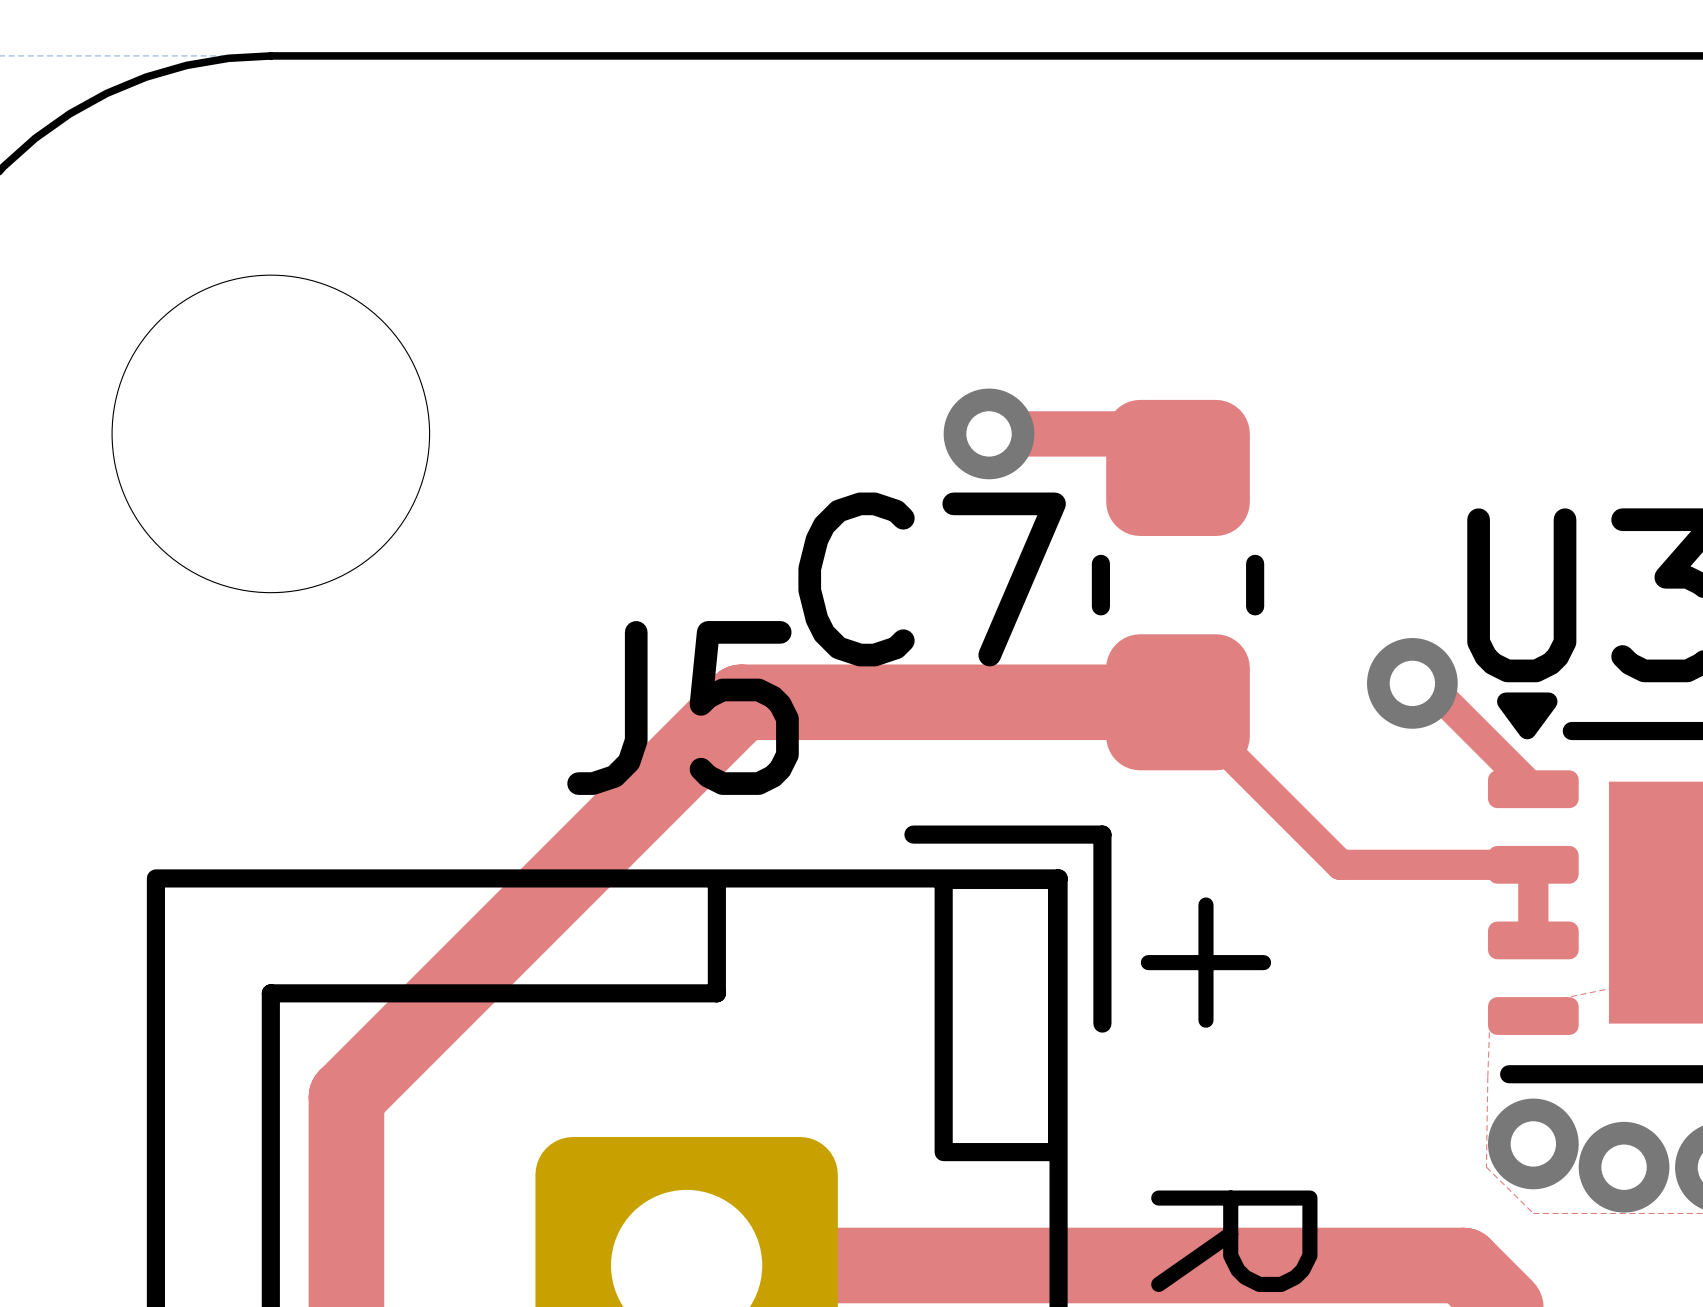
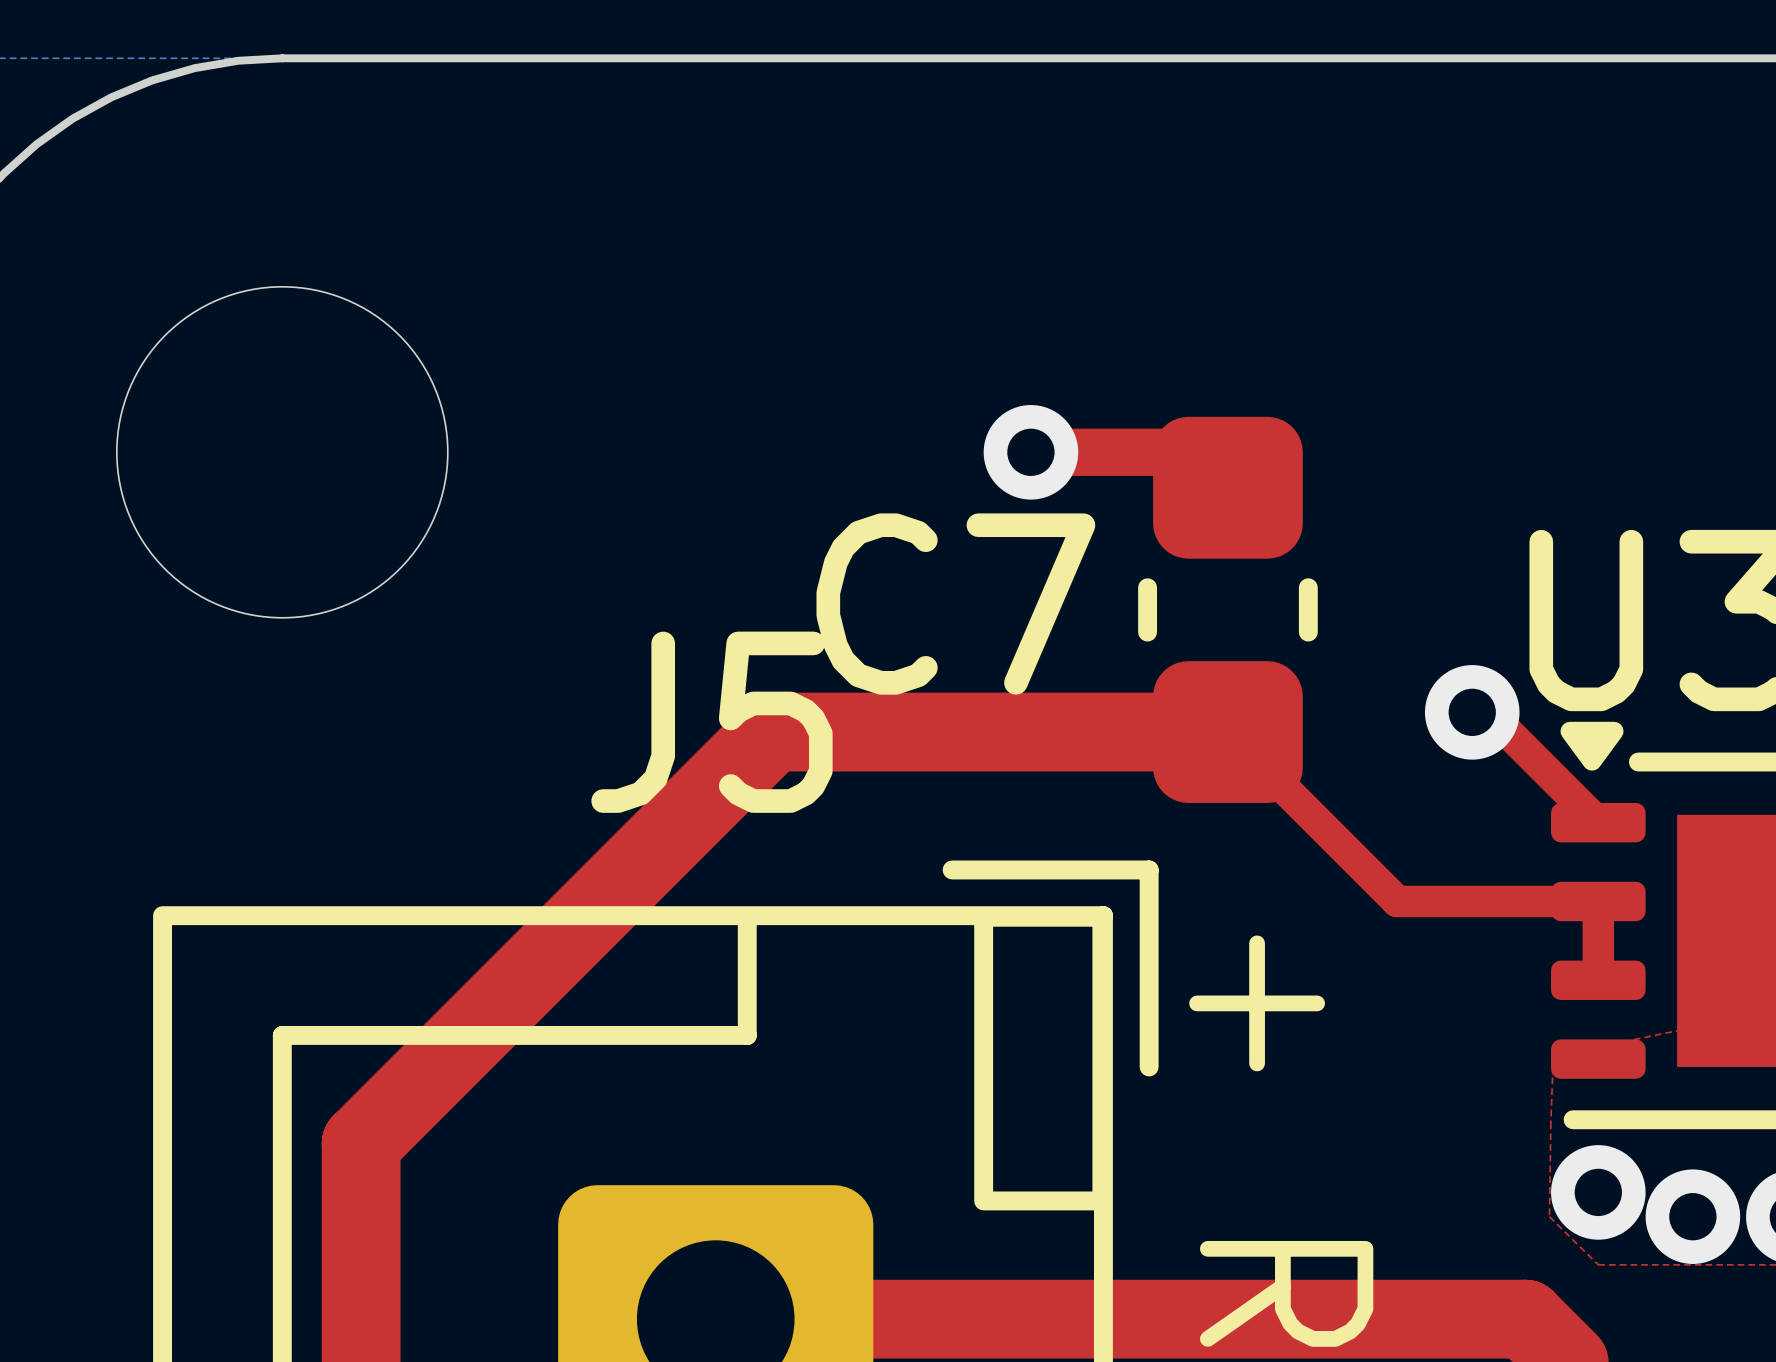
C7 name position: C7 (932, 579) -> C7 (955, 604)
J5 name position: J5 (683, 707) -> J5 (711, 722)

